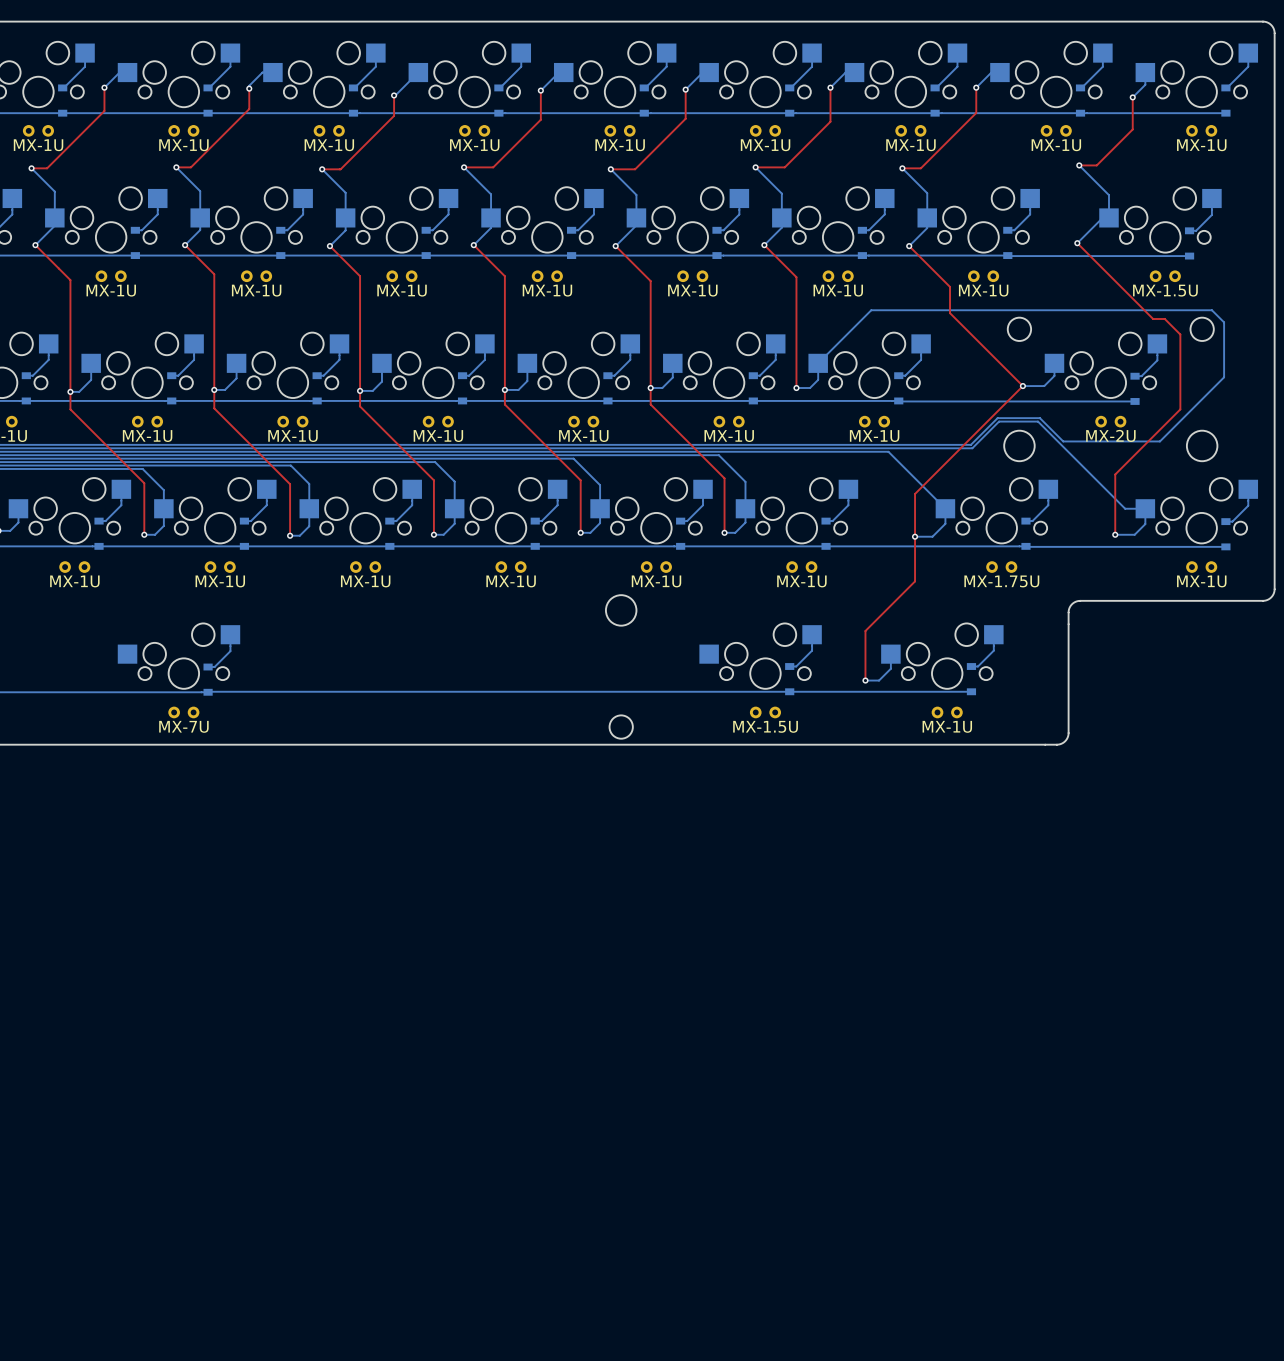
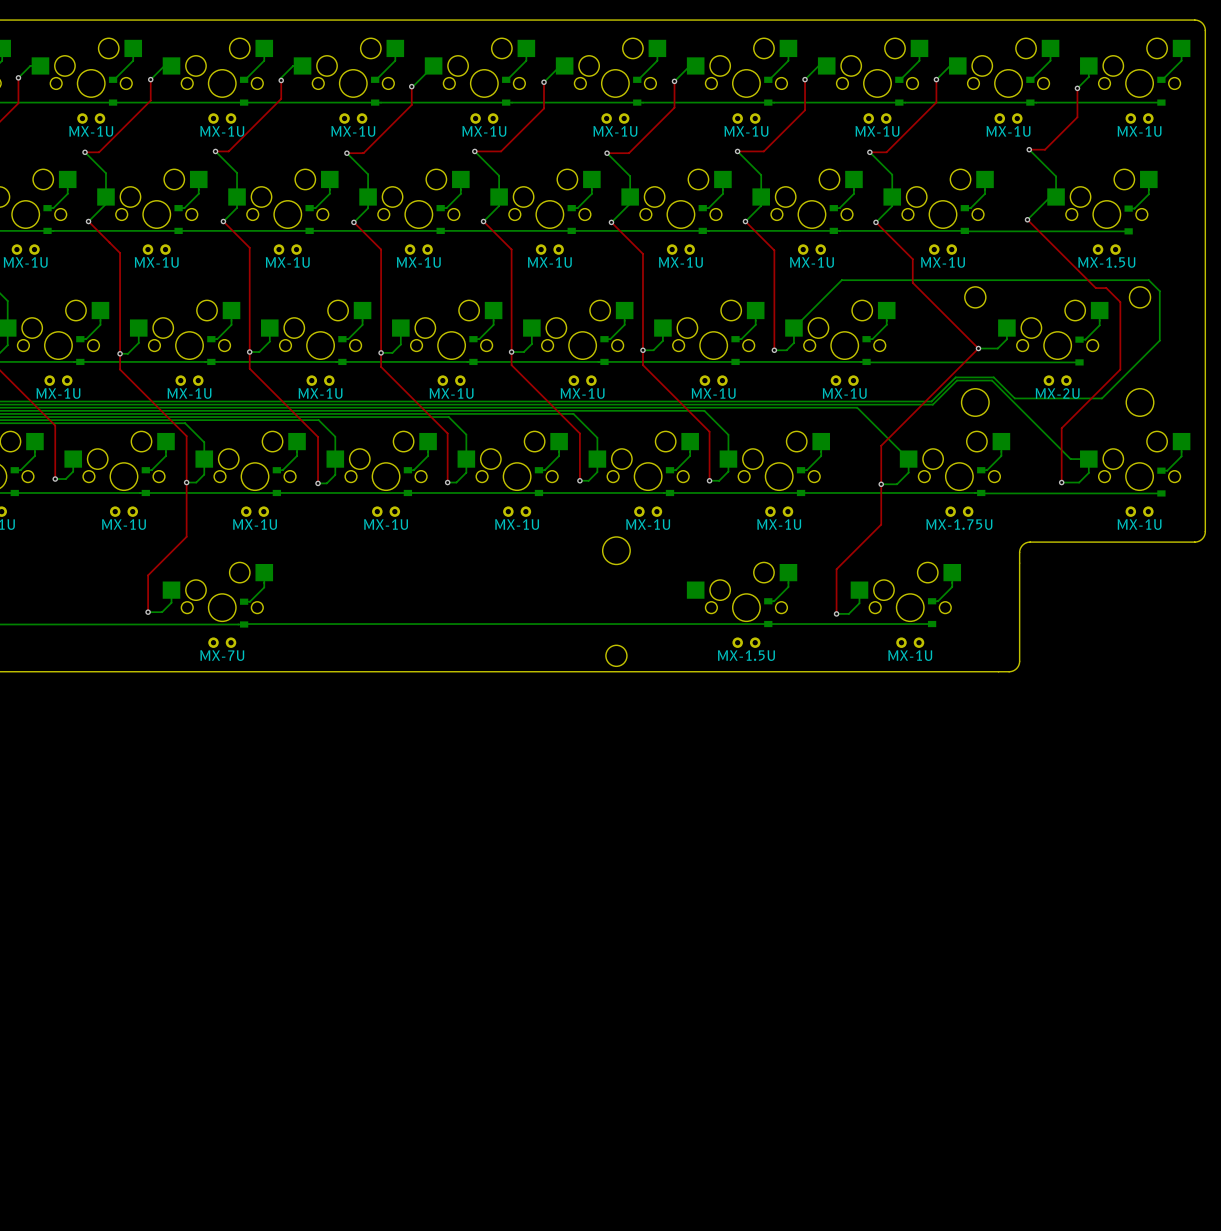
top track: none -> (186, 482) (186, 536) (148, 575) (148, 612)
bottom track: none -> (171, 590) (171, 602) (162, 612) (148, 612)
via: none -> (148, 612)

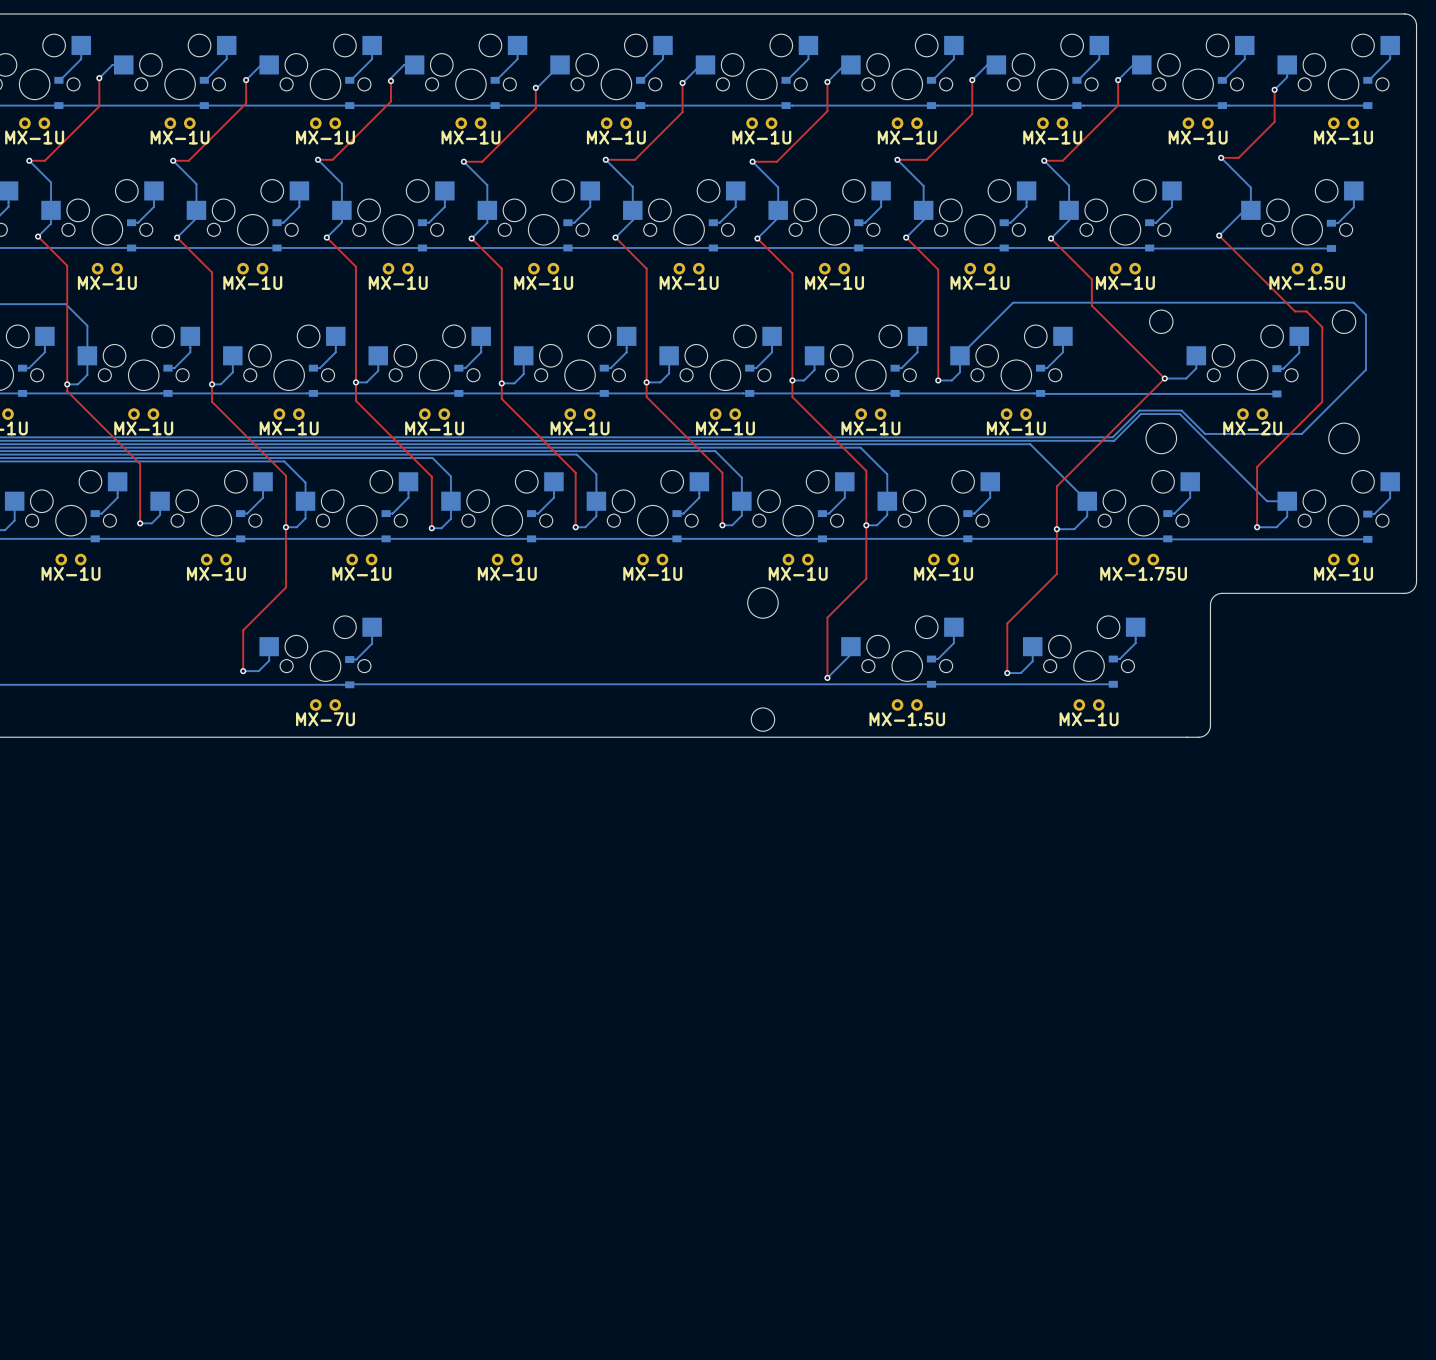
top track: none -> (866, 525) (866, 578) (827, 617) (827, 677)
bottom track: none -> (850, 646) (850, 654) (827, 677)
via: none -> (827, 677)

